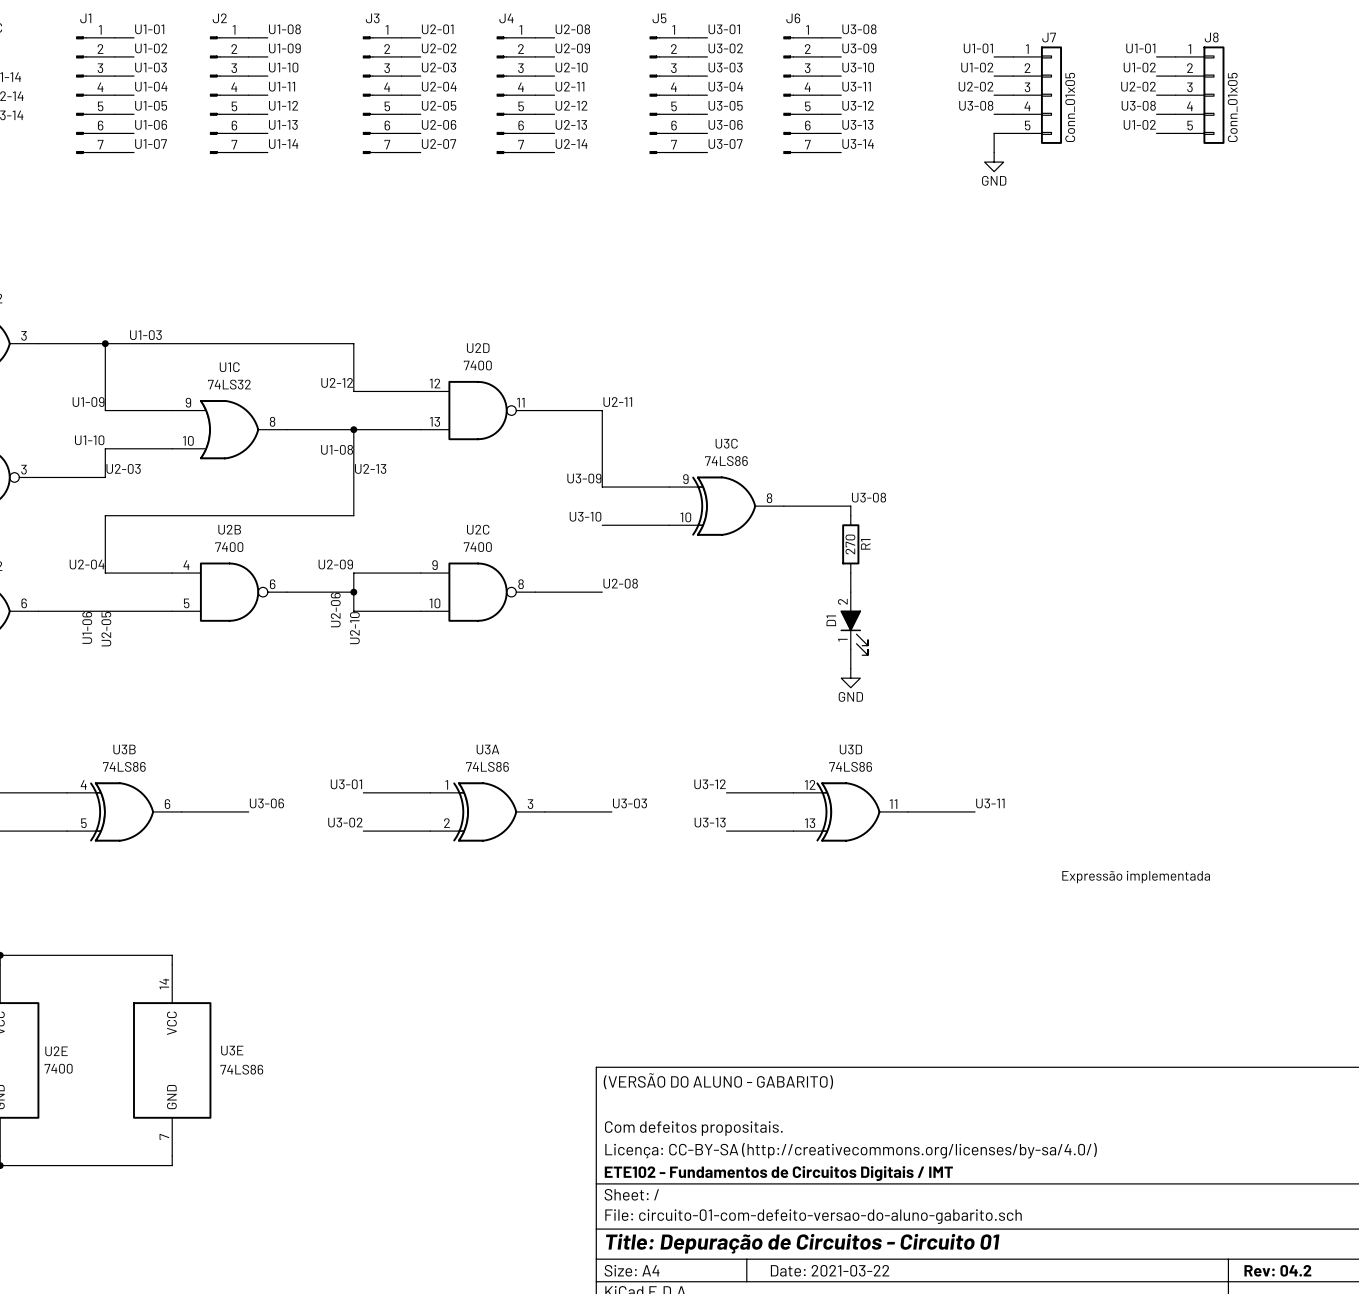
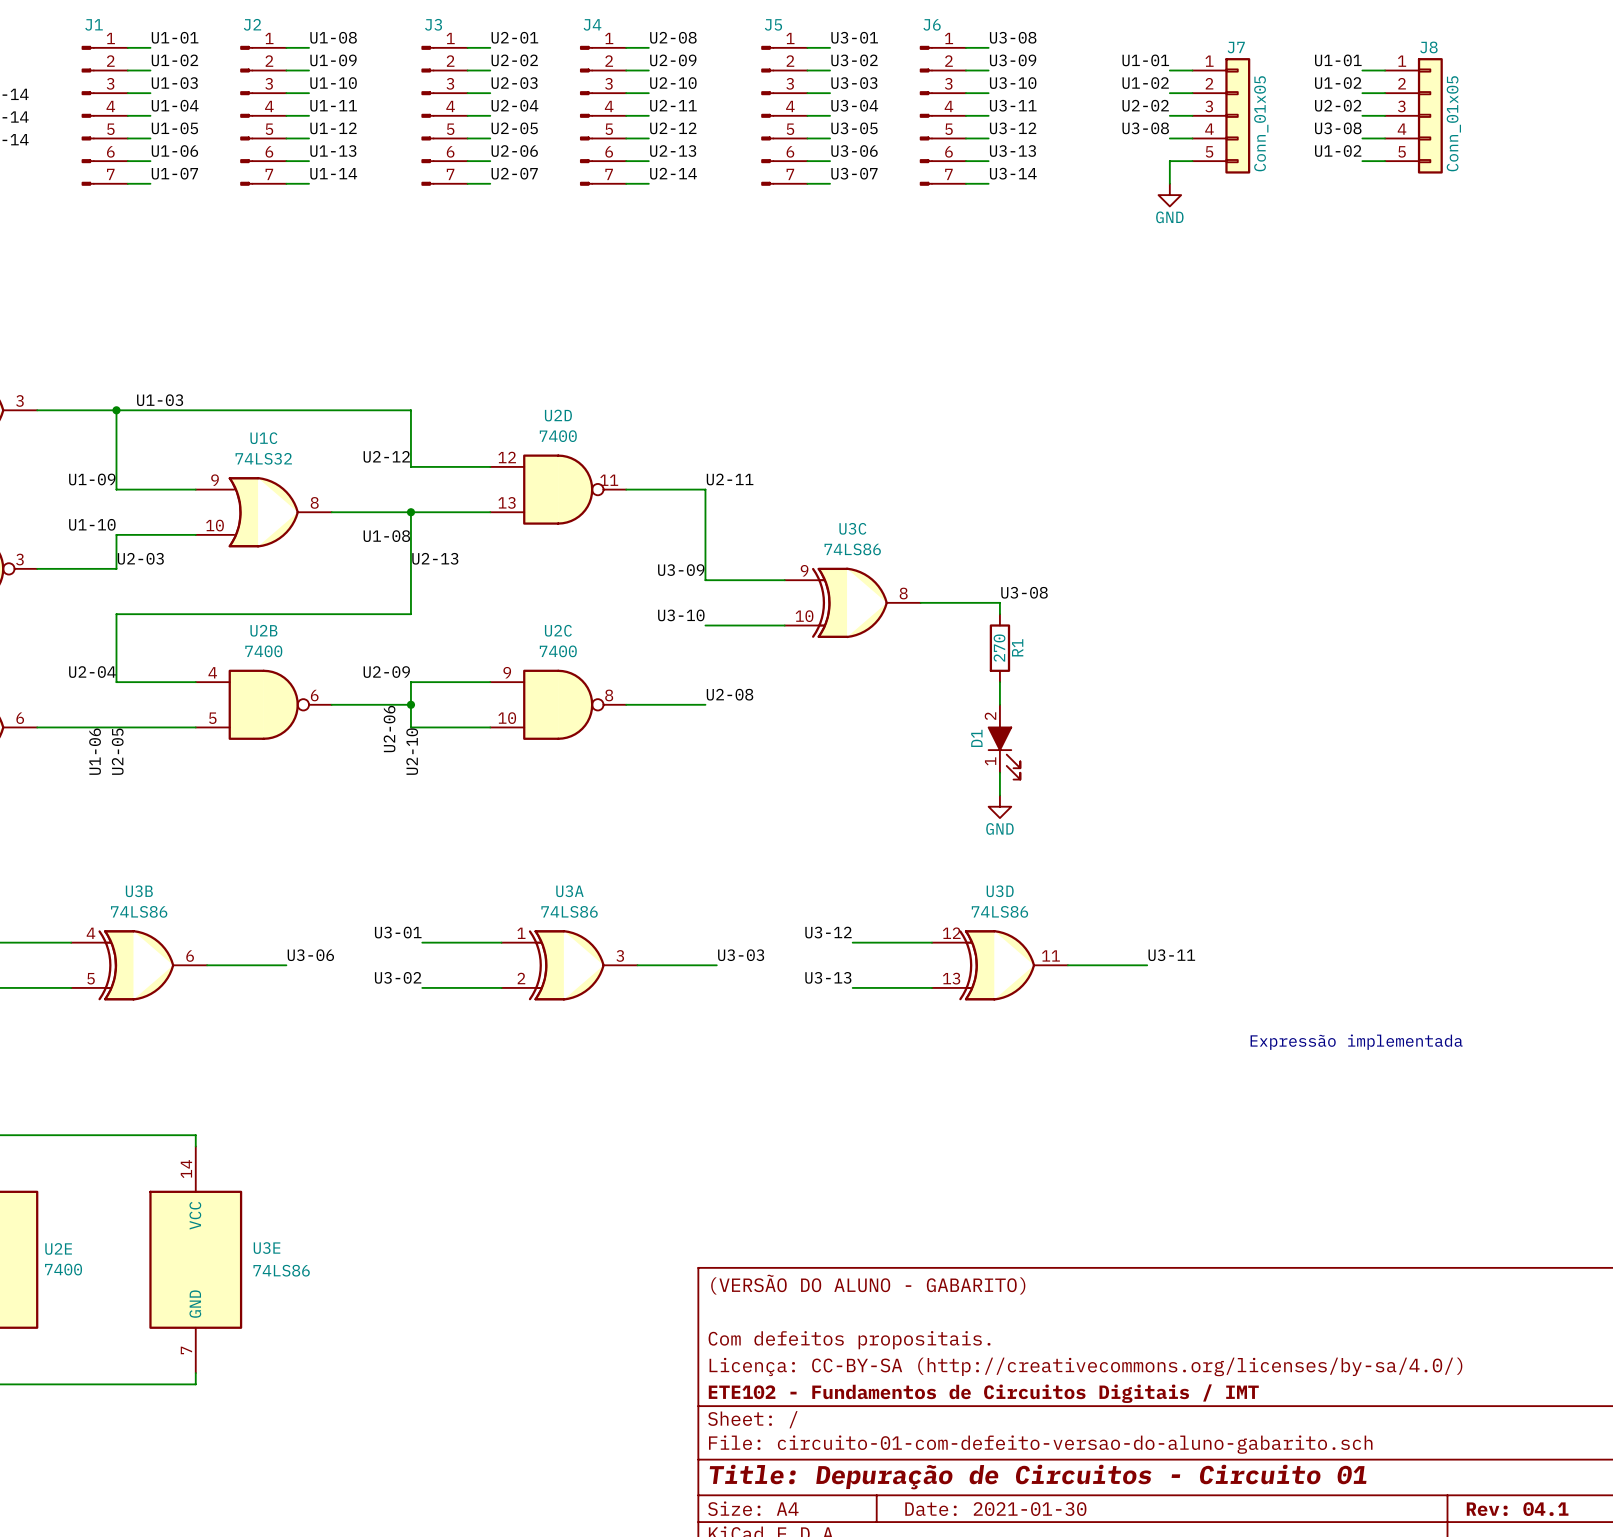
title block: Date: 2021-03-22 (830, 1270) -> Date: 2021-01-30 (995, 1509)
title block: Rev: 04.2 (1277, 1270) -> Rev: 04.1 (1517, 1509)

